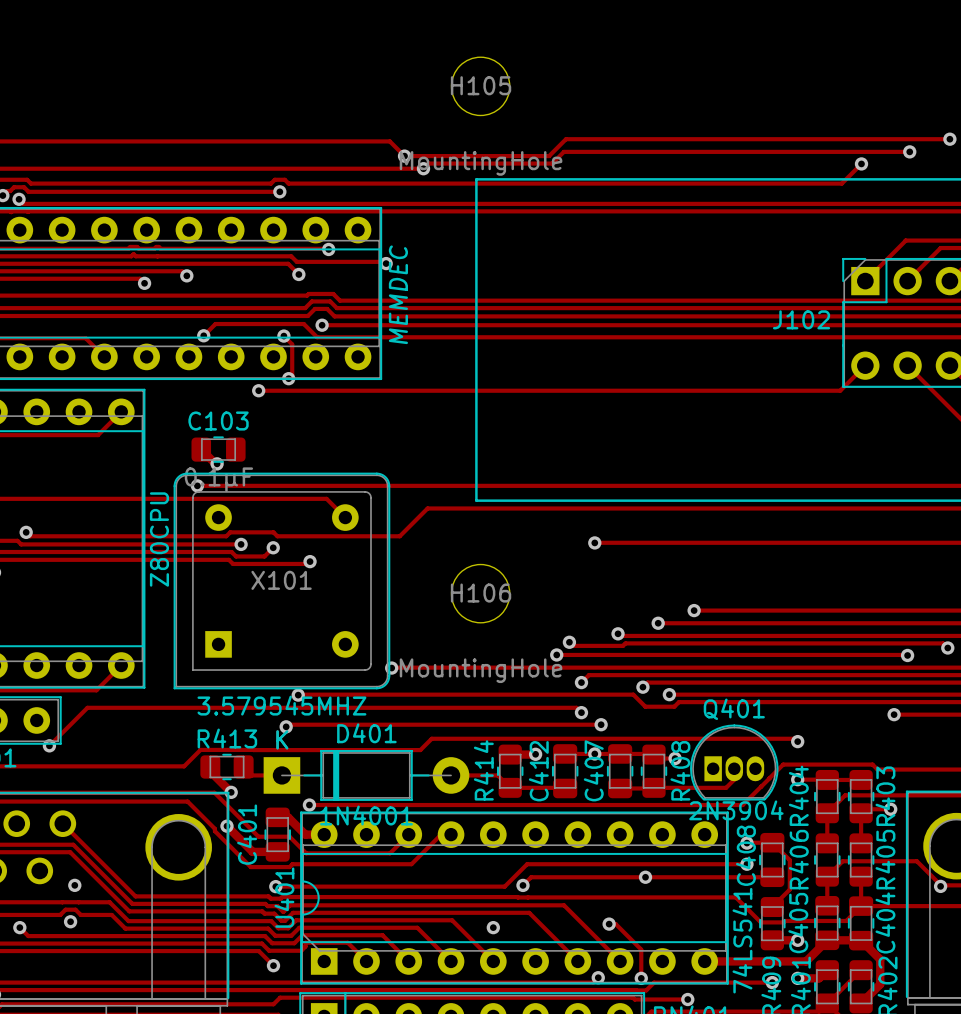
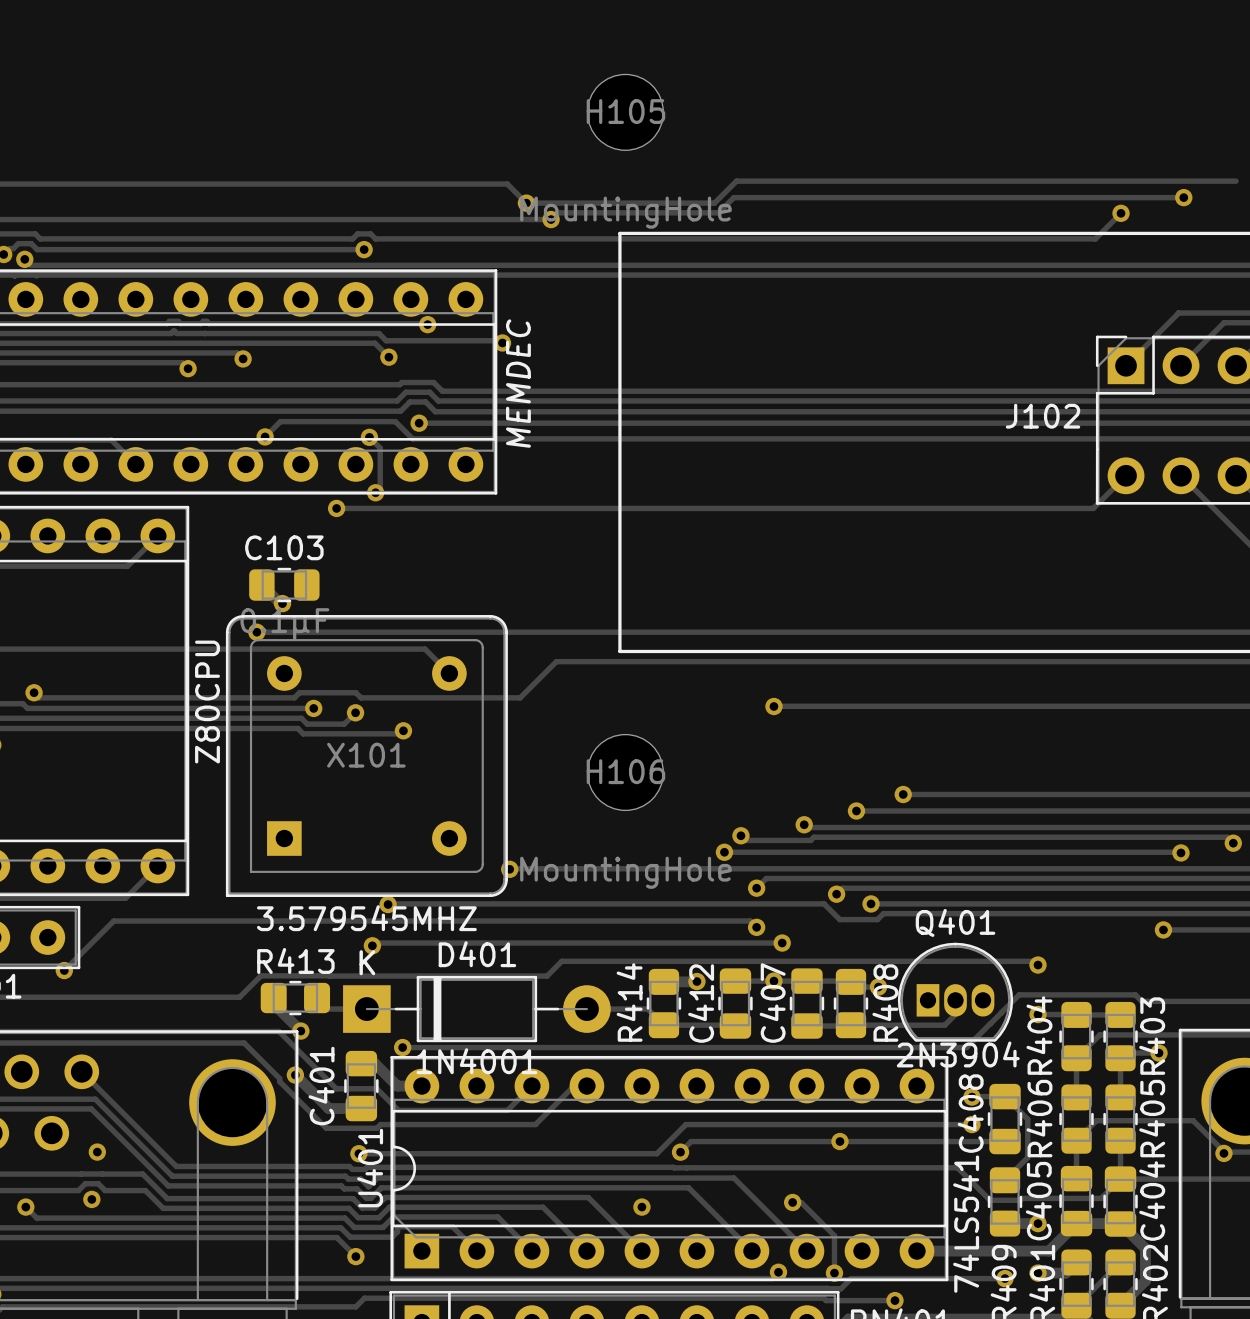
via: (949, 139) -> none

